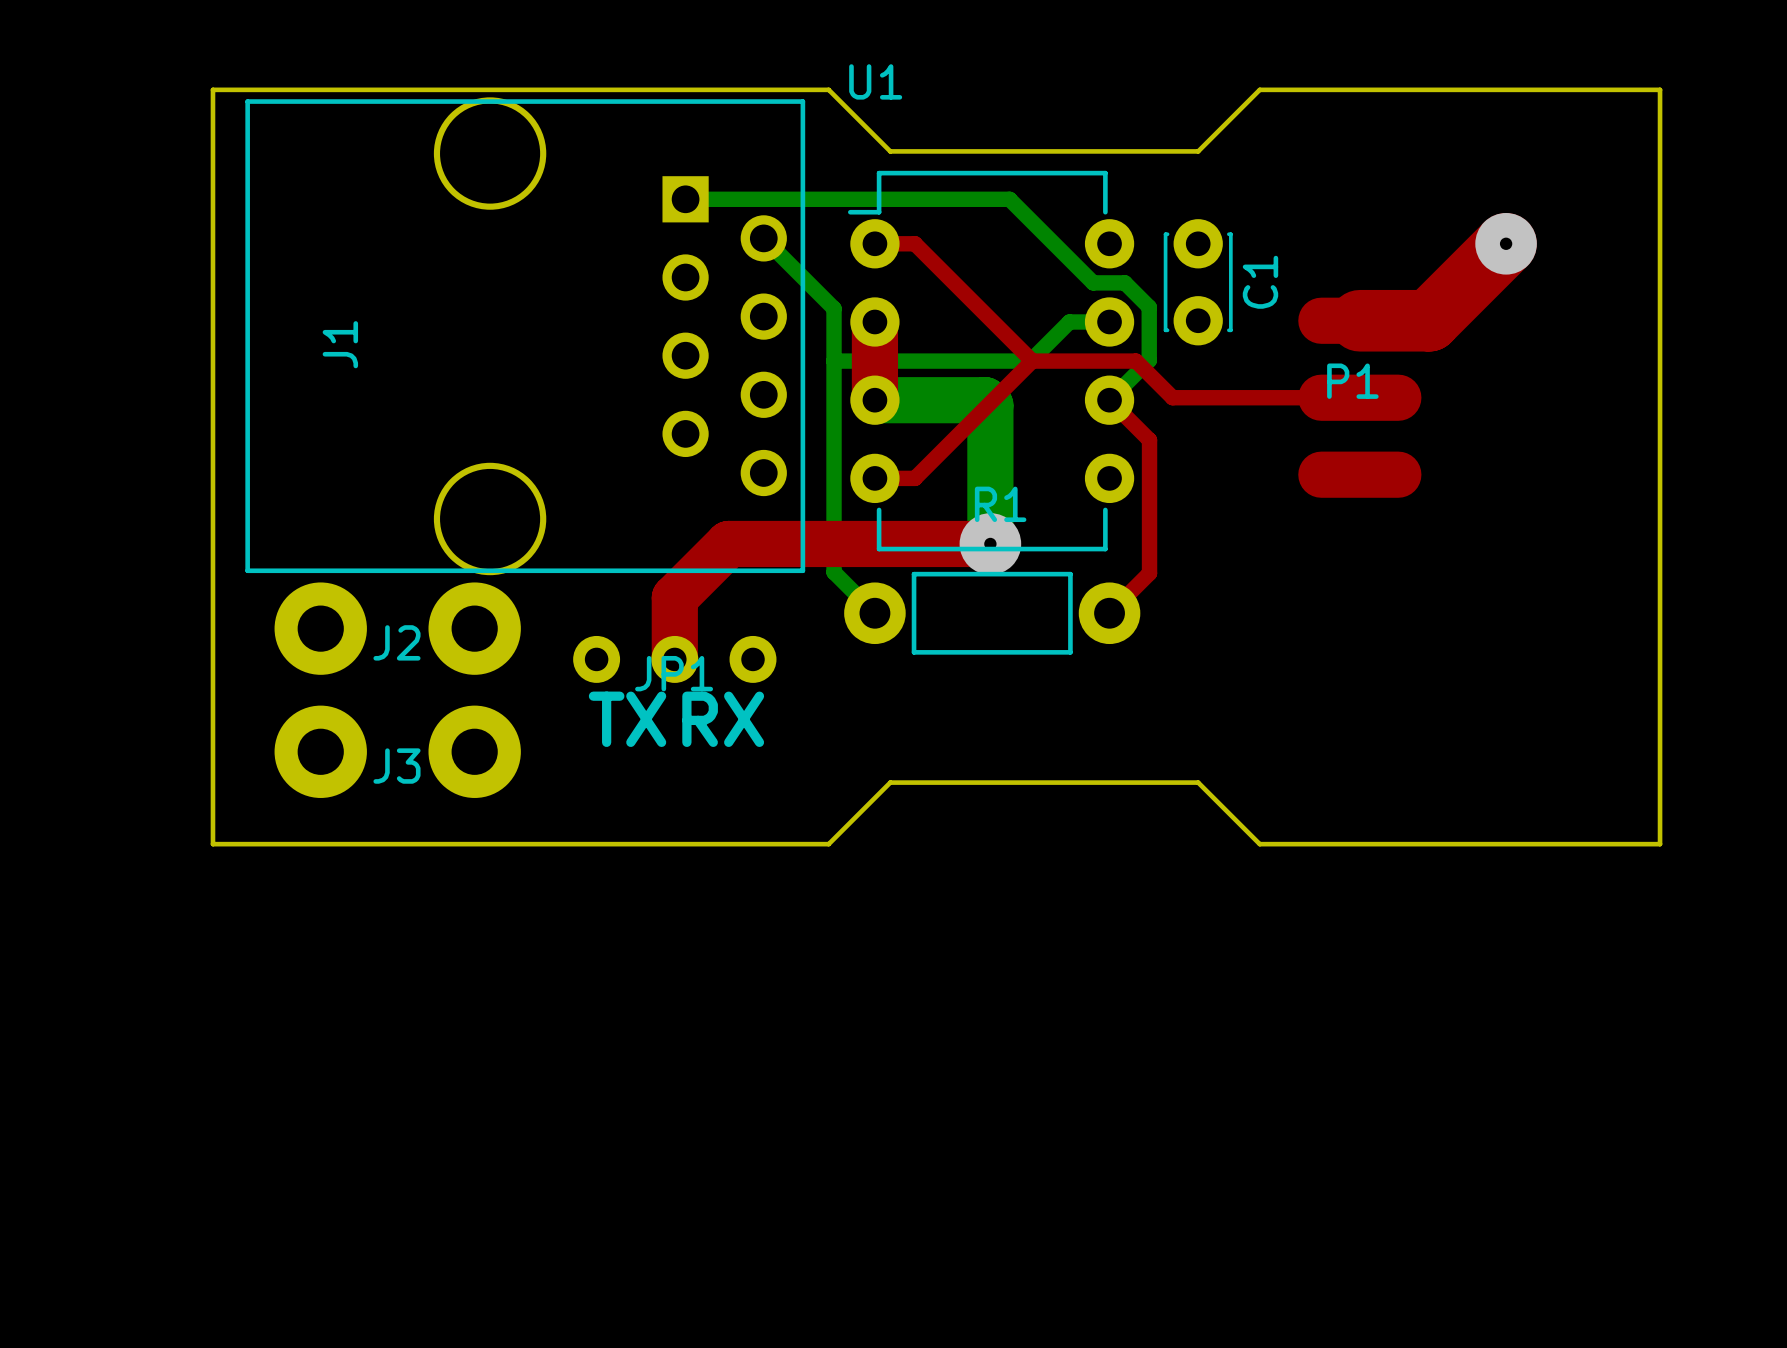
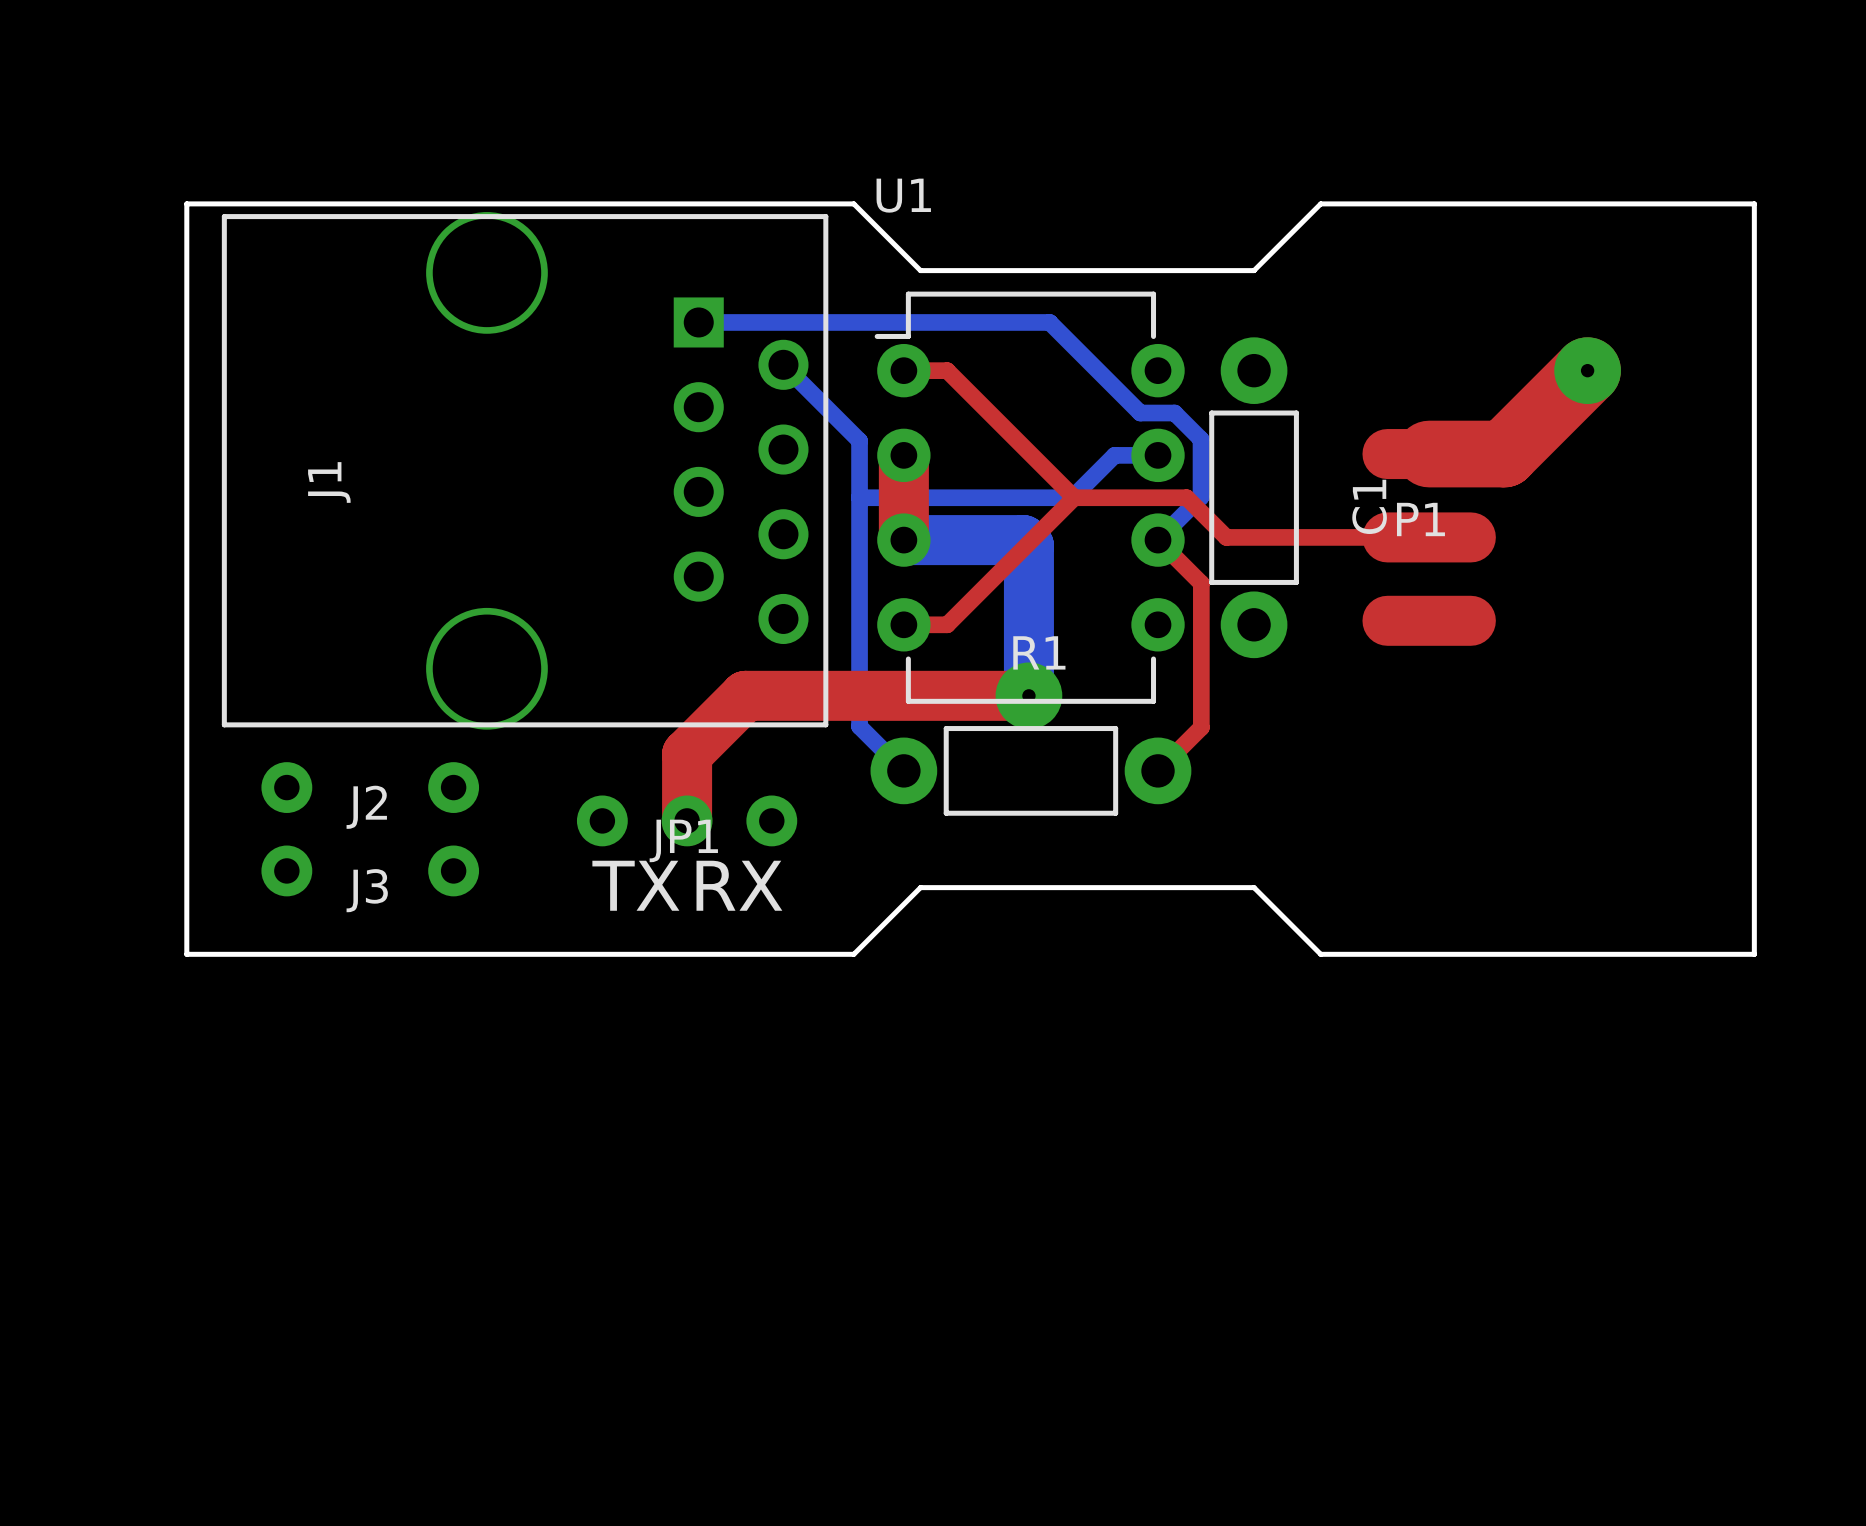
C1 footprint: [1163, 219, 1233, 346] -> [1209, 337, 1299, 659]
J2 footprint: [274, 582, 521, 675] -> [261, 762, 480, 813]
J3 footprint: [274, 705, 521, 798] -> [261, 845, 480, 897]
board edge: (212, 782) (212, 844) (828, 844) (890, 782) (1198, 782) (1259, 844) (1660, 844) (1660, 782) -> (186, 954) (853, 954) (920, 887) (1254, 887) (1320, 954) (1754, 954)

